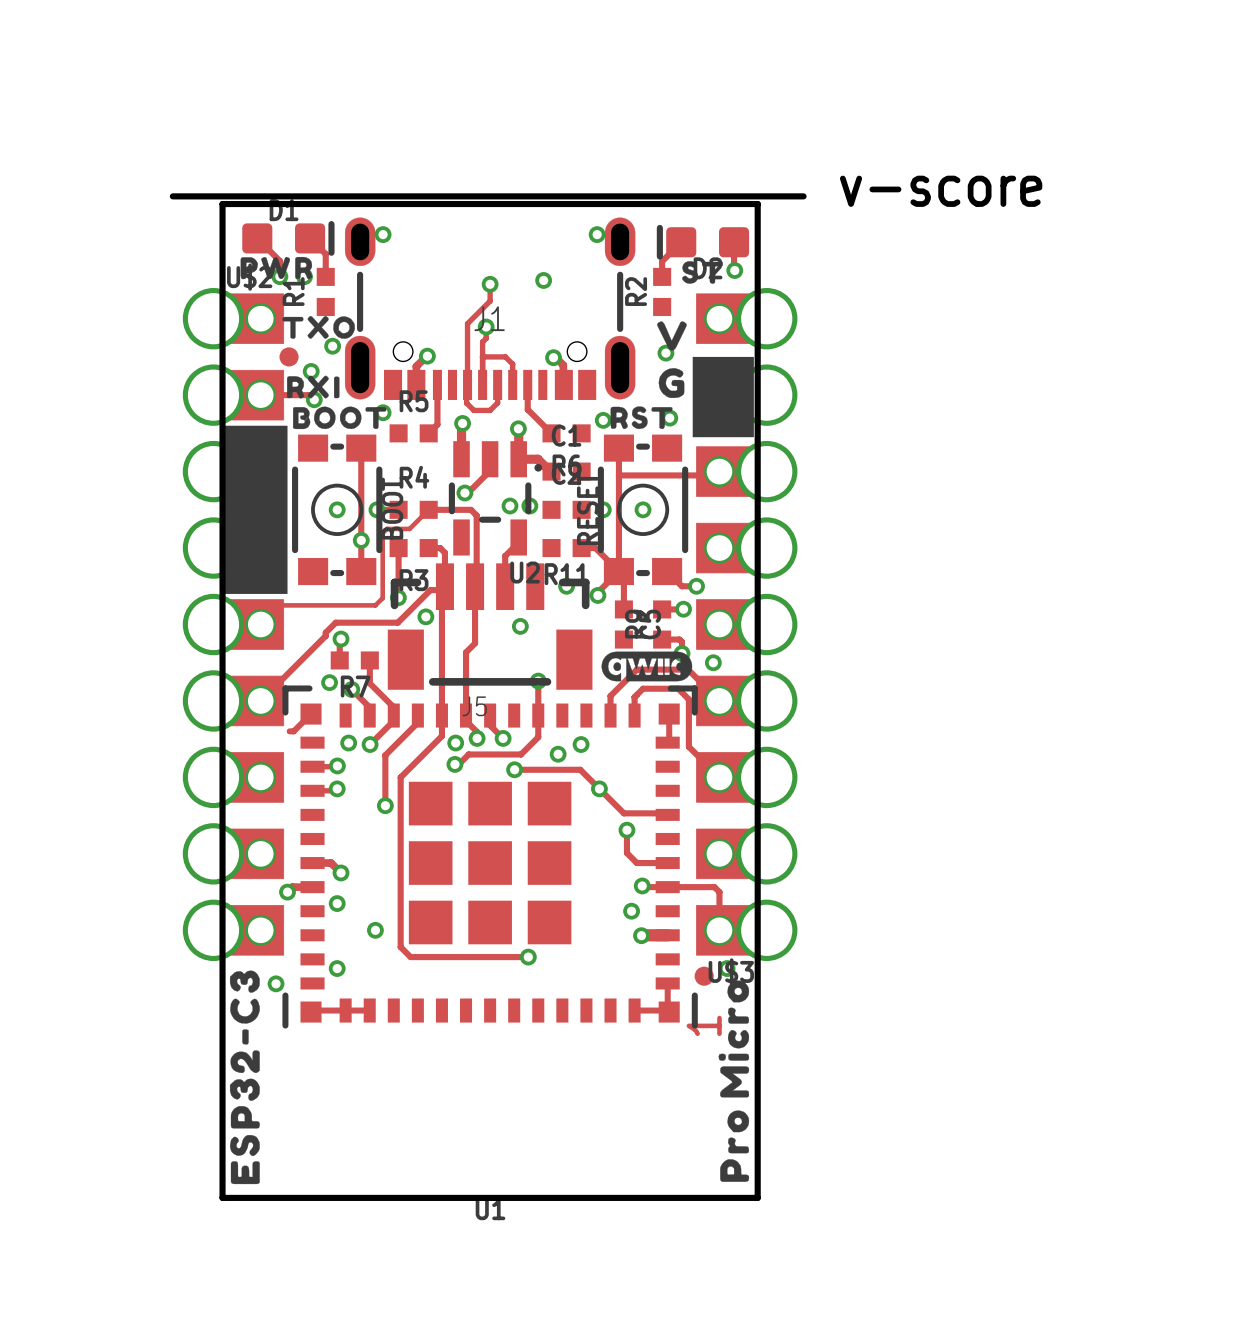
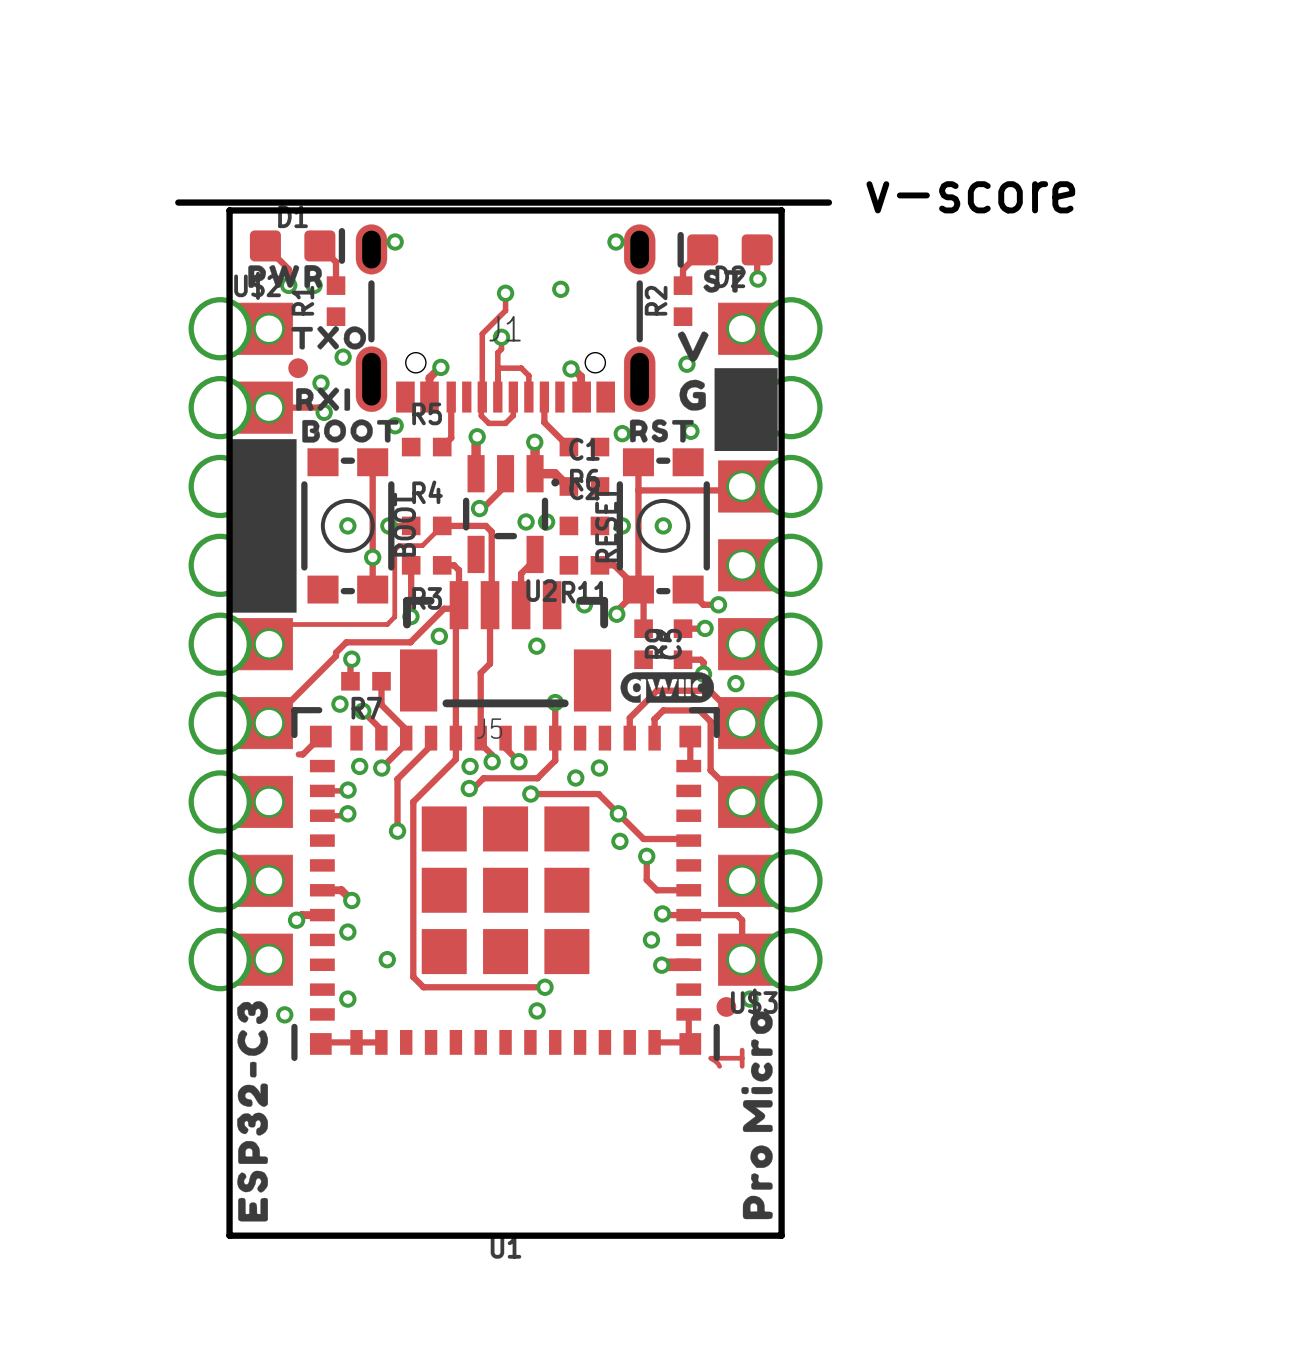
via: none -> (619, 841)
via: none -> (537, 1010)

